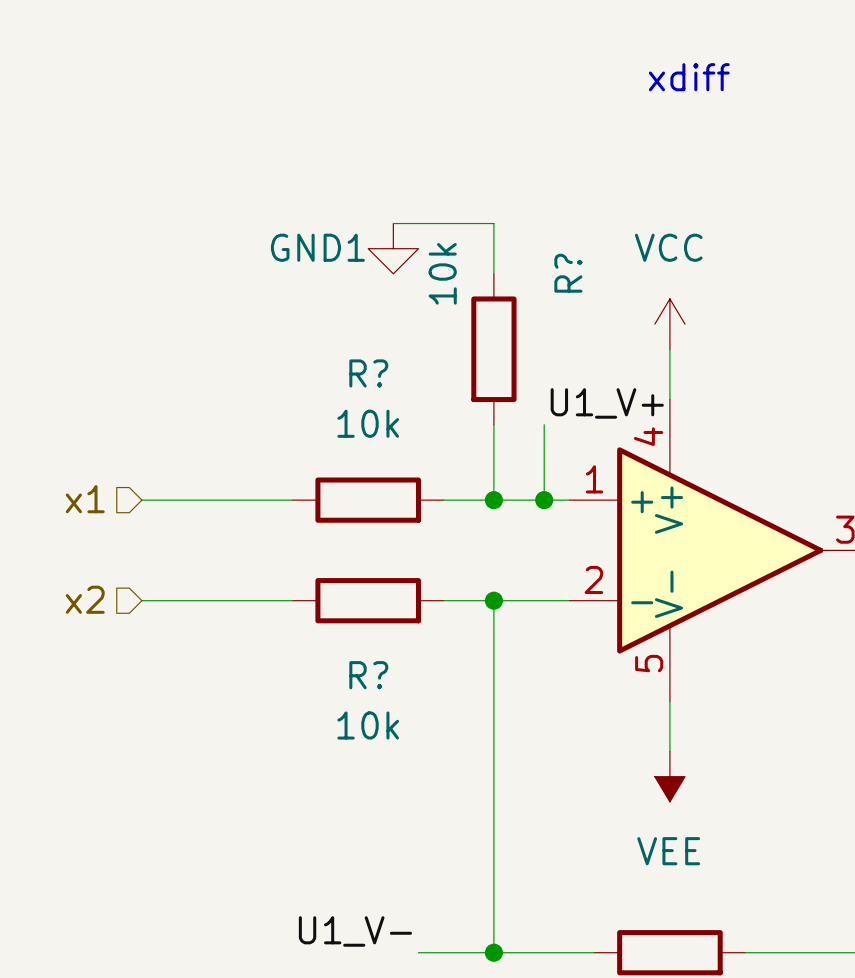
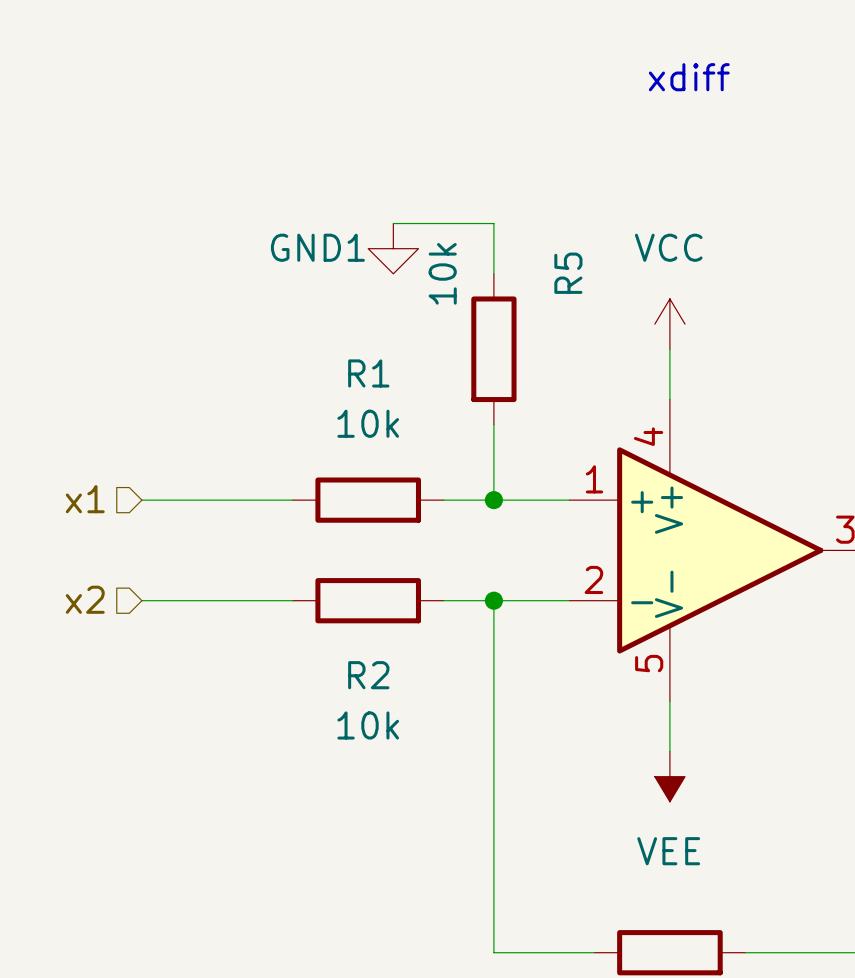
R? name: R? (568, 273) -> R5 (568, 273)
R? name: R? (368, 373) -> R1 (368, 373)
label: U1_V+ (607, 403) -> none
wire: (544, 424) (544, 500) -> none
junction: (544, 500) -> none
R? name: R? (368, 675) -> R2 (368, 675)
label: U1_V- (355, 931) -> none
wire: (418, 952) (493, 952) -> none
junction: (493, 952) -> none

